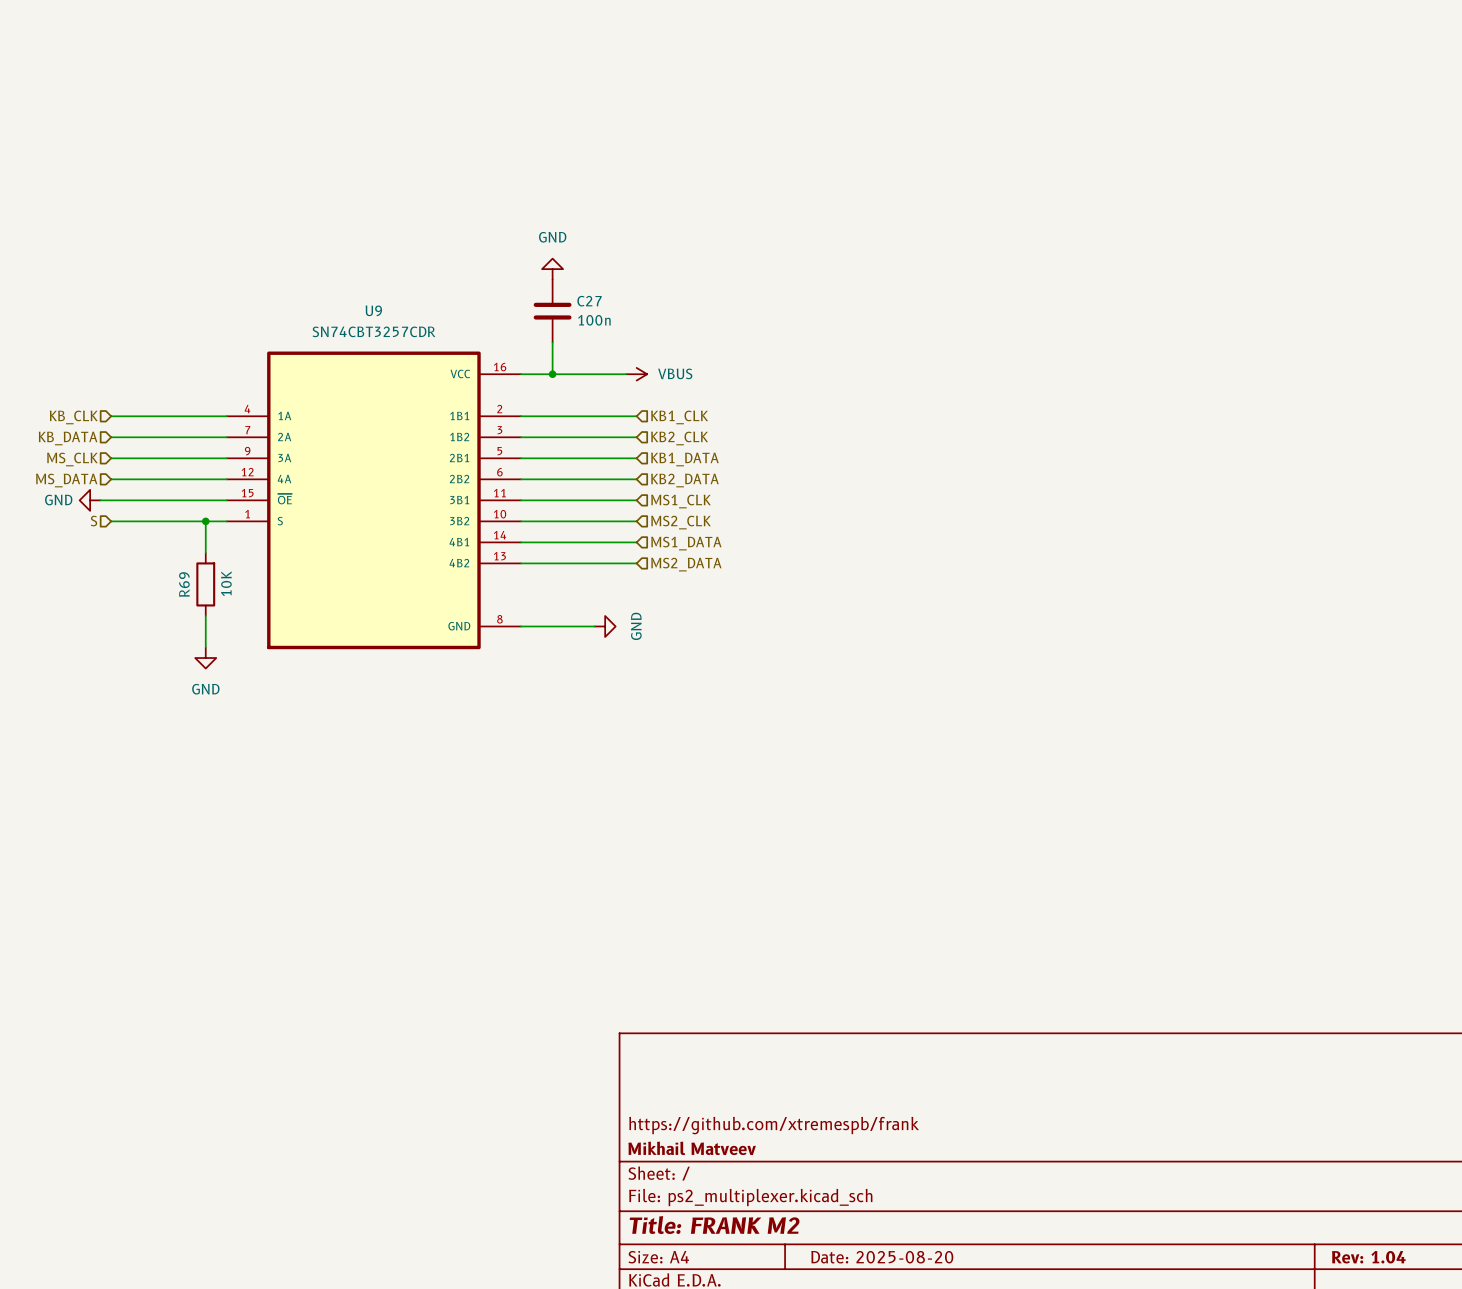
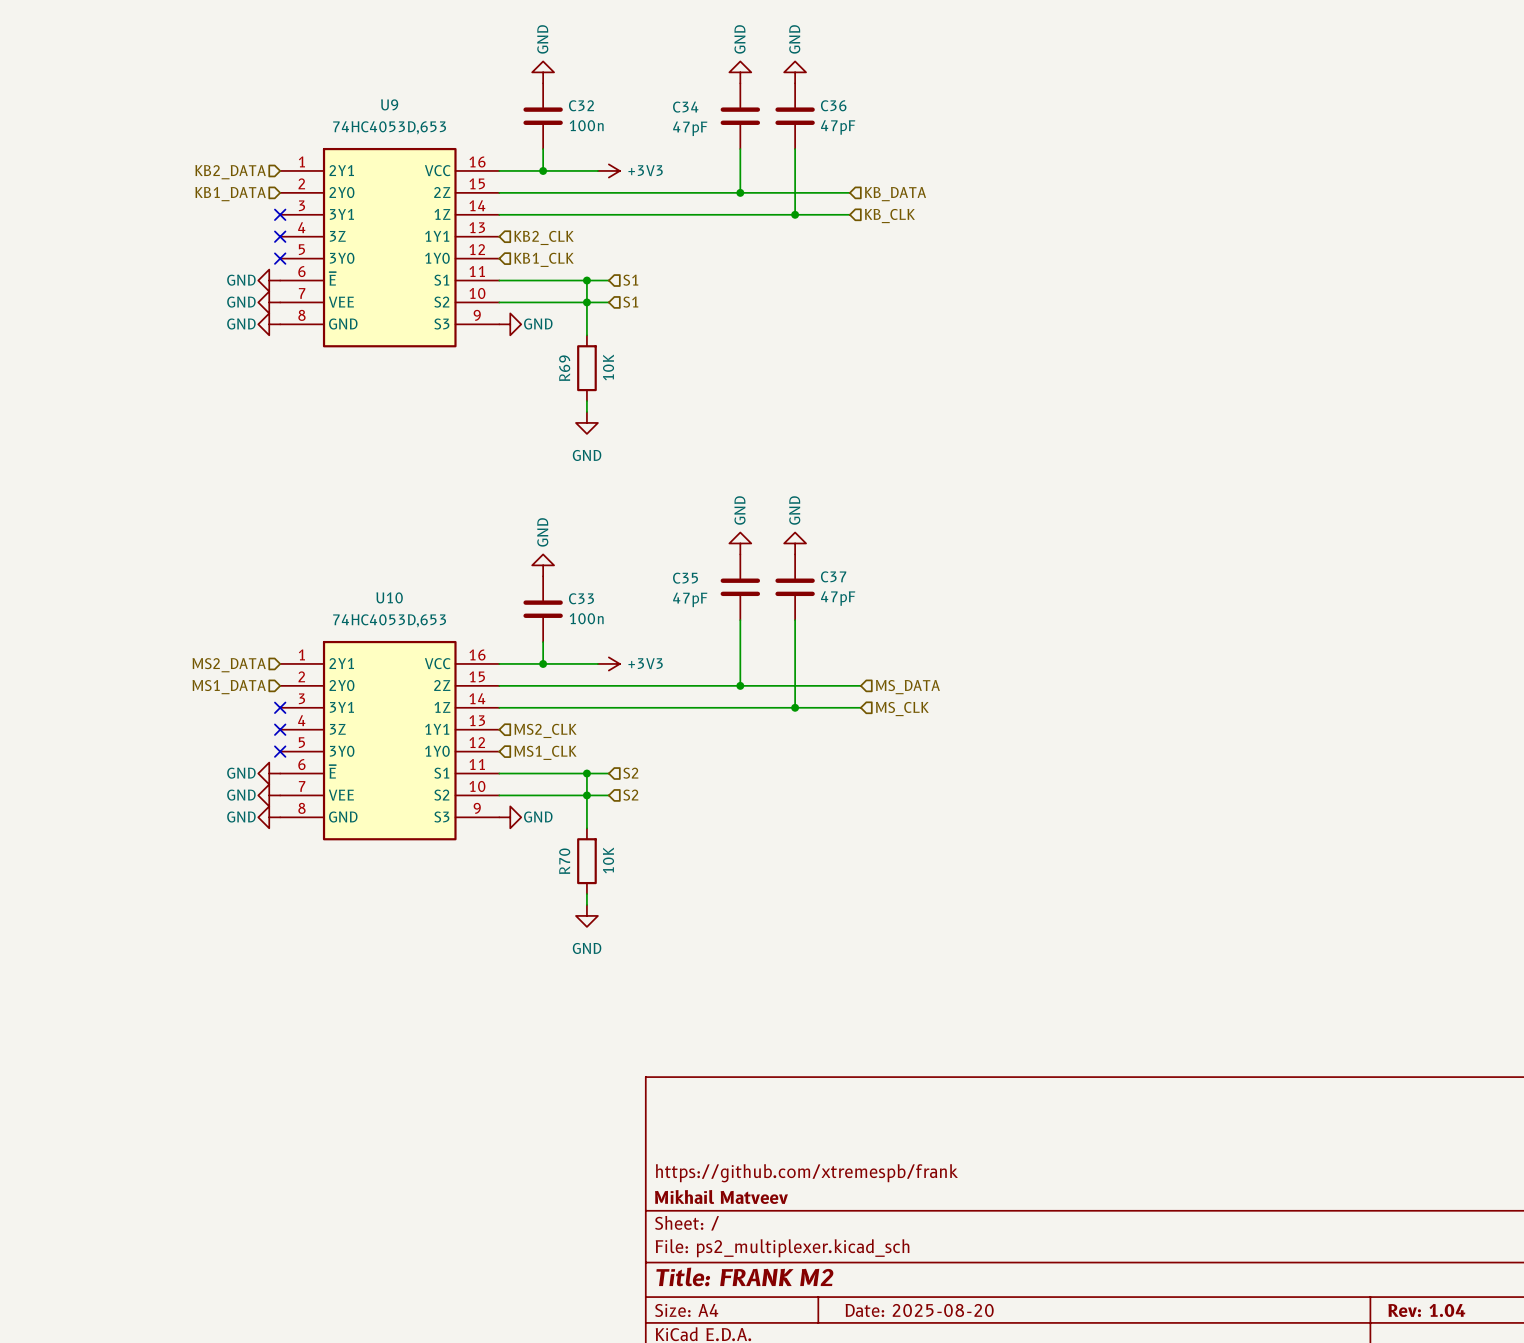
power symbol: none -> GND (543, 72)
power symbol: none -> GND (740, 72)
power symbol: none -> GND (795, 72)
C32: none -> 100n (543, 116)
C34: none -> 47pF (740, 116)
C36: none -> 47pF (795, 116)
wire: none -> (543, 149) (543, 170)
wire: none -> (740, 149) (740, 192)
wire: none -> (795, 149) (795, 214)
wire: none -> (499, 170) (597, 170)
junction: none -> (543, 170)
power symbol: none -> +3V3 (608, 170)
hierarchical label: none -> KB2_DATA (230, 172)
wire: none -> (499, 192) (849, 192)
junction: none -> (740, 192)
hierarchical label: none -> KB1_DATA (230, 194)
hierarchical label: none -> KB_DATA (895, 194)
no-connect mark: none -> (280, 214)
wire: none -> (499, 214) (849, 214)
junction: none -> (795, 214)
hierarchical label: none -> KB_CLK (889, 216)
no-connect mark: none -> (280, 236)
hierarchical label: none -> KB2_CLK (544, 237)
no-connect mark: none -> (280, 258)
hierarchical label: none -> KB1_CLK (544, 259)
hierarchical label: none -> S1 (630, 280)
power symbol: none -> GND (269, 280)
wire: none -> (499, 280) (608, 280)
power symbol: GND (552, 269) -> none
wire: none -> (586, 280) (586, 335)
junction: none -> (586, 280)
hierarchical label: none -> S1 (630, 302)
power symbol: none -> GND (269, 302)
junction: none -> (586, 302)
U9 name position: U9 (373, 310) -> U9 (389, 104)
power symbol: none -> GND (269, 324)
power symbol: none -> GND (510, 324)
C27: 100n (552, 311) -> none
U9 value: SN74CBT3257CDR (373, 331) -> 74HC4053D,653 (389, 127)
wire: (552, 342) (552, 374) -> none
U9 symbol: [226, 351, 522, 650] -> [280, 147, 500, 348]
wire: (521, 374) (626, 374) -> (499, 302) (608, 302)
junction: (552, 374) -> none
power symbol: VBUS (636, 374) -> none
wire: none -> (586, 401) (586, 411)
power symbol: none -> GND (586, 422)
wire: (111, 416) (226, 416) -> none
wire: (521, 416) (636, 416) -> none
hierarchical label: KB_CLK (73, 417) -> none
hierarchical label: KB1_CLK (679, 417) -> none
wire: (111, 437) (226, 437) -> none
wire: (521, 437) (636, 437) -> none
hierarchical label: KB_DATA (68, 438) -> none
hierarchical label: KB2_CLK (679, 438) -> none
wire: (111, 458) (226, 458) -> none
wire: (521, 458) (636, 458) -> none
hierarchical label: MS_CLK (72, 459) -> none
hierarchical label: KB1_DATA (684, 459) -> none
wire: (111, 479) (226, 479) -> none
wire: (521, 479) (636, 479) -> none
hierarchical label: MS_DATA (66, 480) -> none
hierarchical label: KB2_DATA (684, 480) -> none
power symbol: GND (90, 500) -> none
wire: (100, 500) (226, 500) -> none
wire: (521, 500) (636, 500) -> none
hierarchical label: MS1_CLK (681, 501) -> none
hierarchical label: S (93, 521) -> none
wire: (111, 521) (226, 521) -> none
wire: (205, 521) (205, 552) -> none
junction: (205, 521) -> none
wire: (521, 521) (636, 521) -> none
power symbol: none -> GND (740, 543)
power symbol: none -> GND (795, 543)
hierarchical label: MS2_CLK (681, 522) -> none
wire: (521, 542) (636, 542) -> none
power symbol: none -> GND (543, 565)
hierarchical label: MS1_DATA (686, 543) -> none
wire: (521, 563) (636, 563) -> none
C35: none -> 47pF (740, 587)
C37: none -> 47pF (795, 587)
hierarchical label: MS2_DATA (686, 564) -> none
R69 position: (205, 584) -> (586, 368)
C33: none -> 100n (543, 609)
wire: none -> (740, 620) (740, 685)
wire: none -> (795, 620) (795, 707)
wire: (205, 615) (205, 647) -> none
wire: none -> (543, 642) (543, 663)
wire: (521, 626) (594, 626) -> none
power symbol: GND (605, 626) -> none
wire: none -> (499, 663) (597, 663)
junction: none -> (543, 663)
power symbol: none -> +3V3 (608, 663)
hierarchical label: none -> MS2_DATA (229, 665)
power symbol: GND (205, 658) -> none
wire: none -> (499, 685) (860, 685)
junction: none -> (740, 685)
hierarchical label: none -> MS1_DATA (229, 687)
hierarchical label: none -> MS_DATA (907, 687)
no-connect mark: none -> (280, 707)
wire: none -> (499, 707) (860, 707)
junction: none -> (795, 707)
hierarchical label: none -> MS_CLK (902, 709)
no-connect mark: none -> (280, 729)
hierarchical label: none -> MS2_CLK (545, 730)
U10: none -> 74HC4053D,653 (389, 740)
no-connect mark: none -> (280, 751)
hierarchical label: none -> MS1_CLK (545, 752)
hierarchical label: none -> S2 (630, 773)
power symbol: none -> GND (269, 773)
wire: none -> (499, 773) (608, 773)
wire: none -> (586, 773) (586, 828)
junction: none -> (586, 773)
hierarchical label: none -> S2 (630, 795)
power symbol: none -> GND (269, 795)
wire: none -> (499, 795) (608, 795)
junction: none -> (586, 795)
power symbol: none -> GND (269, 817)
power symbol: none -> GND (510, 817)
R70: none -> 10K (586, 861)
wire: none -> (586, 894) (586, 904)
power symbol: none -> GND (586, 915)

